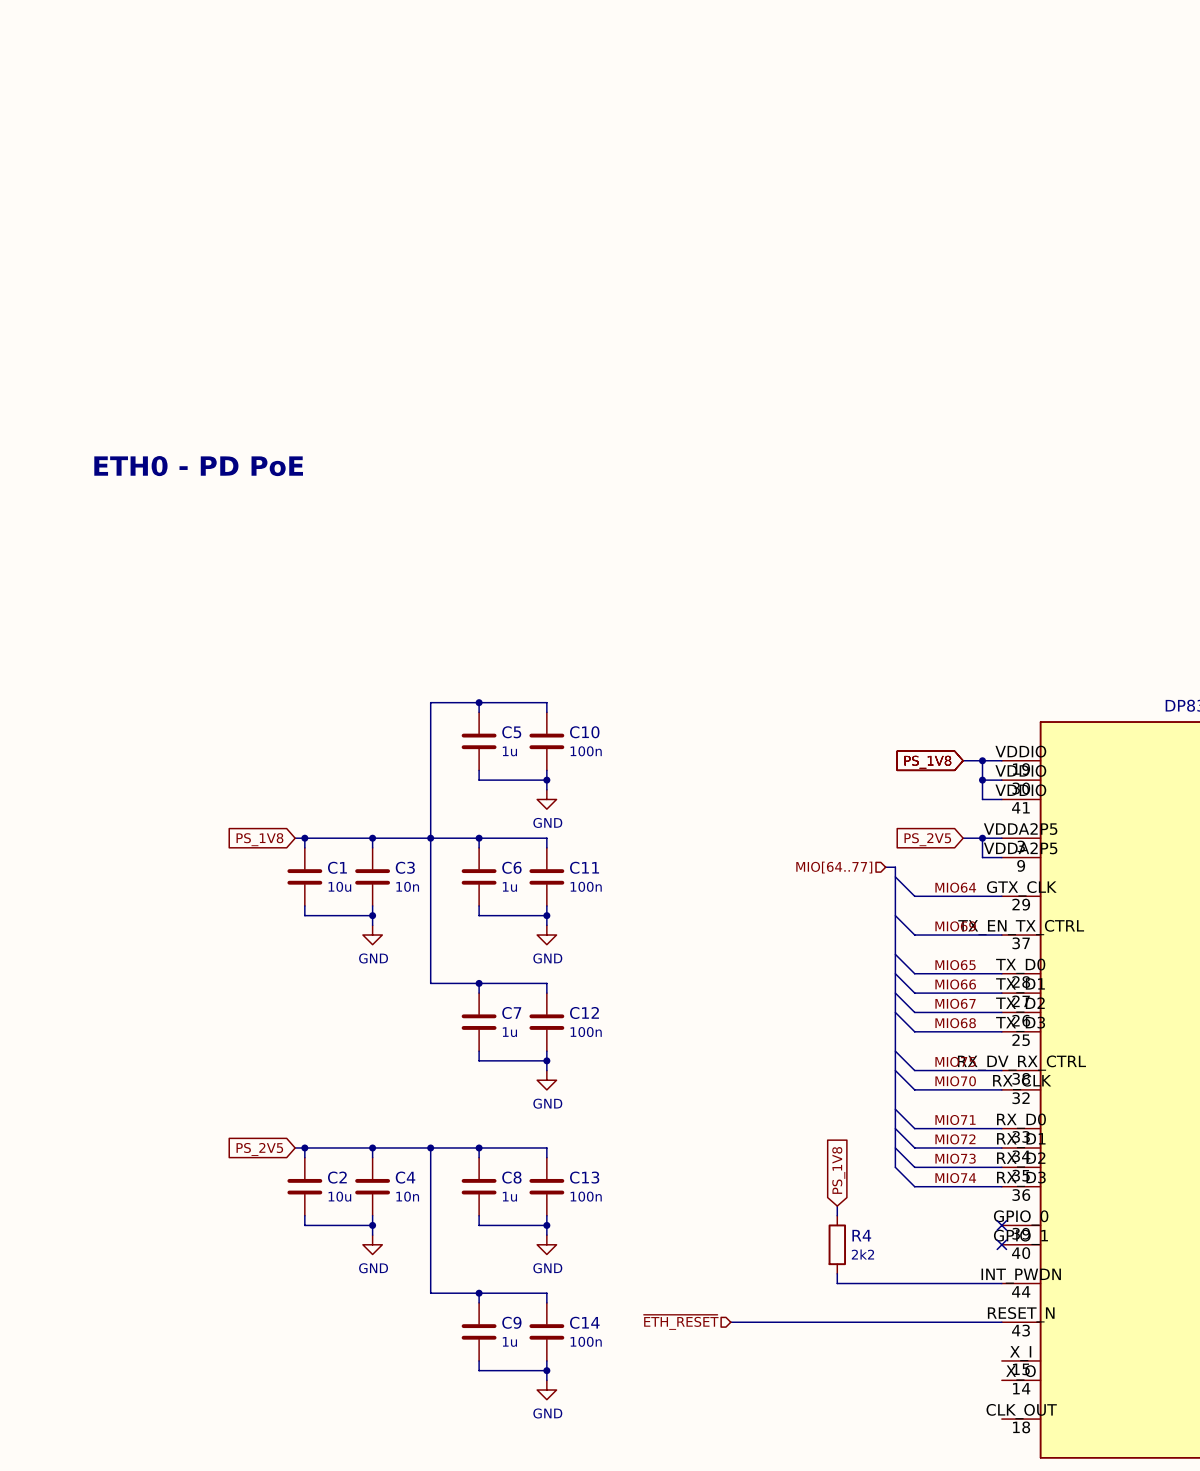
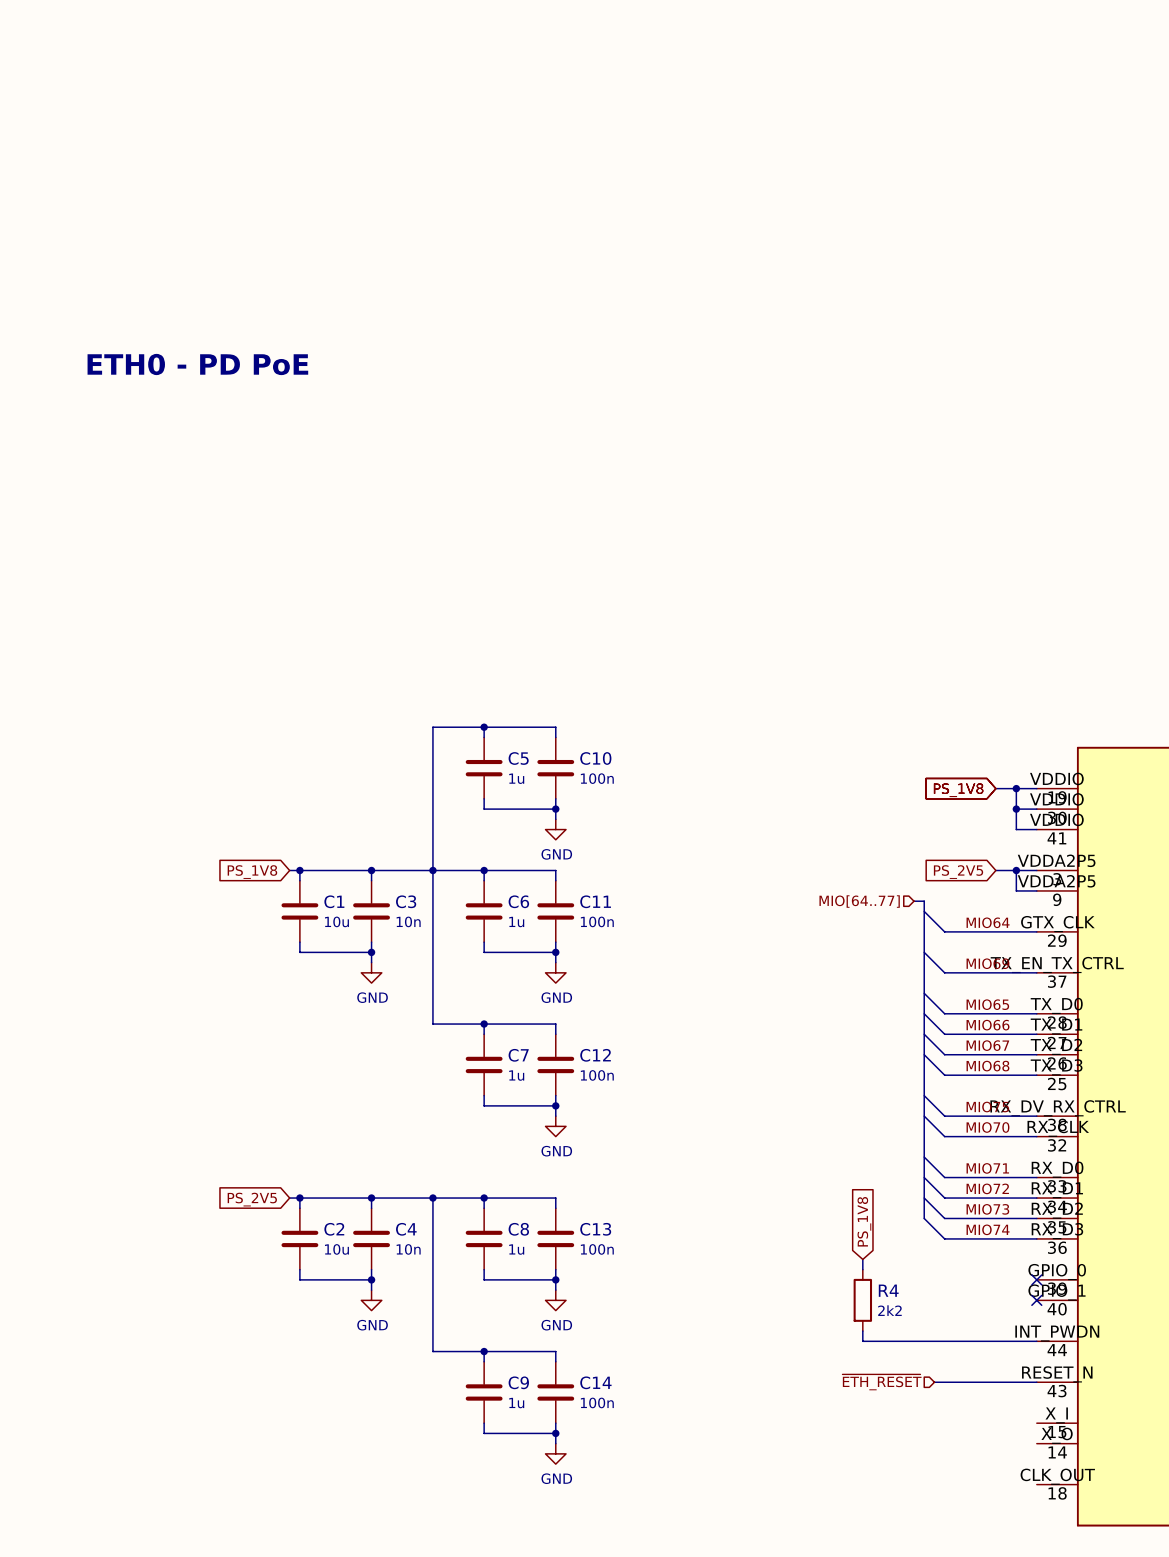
text position: ETH0 - PD PoE (198, 466) -> ETH0 - PD PoE (197, 364)
hierarchical label position: ~{ETH_RESET} (681, 1322) -> ~{ETH_RESET} (882, 1382)
wire: (730, 1322) (905, 1322) -> none

